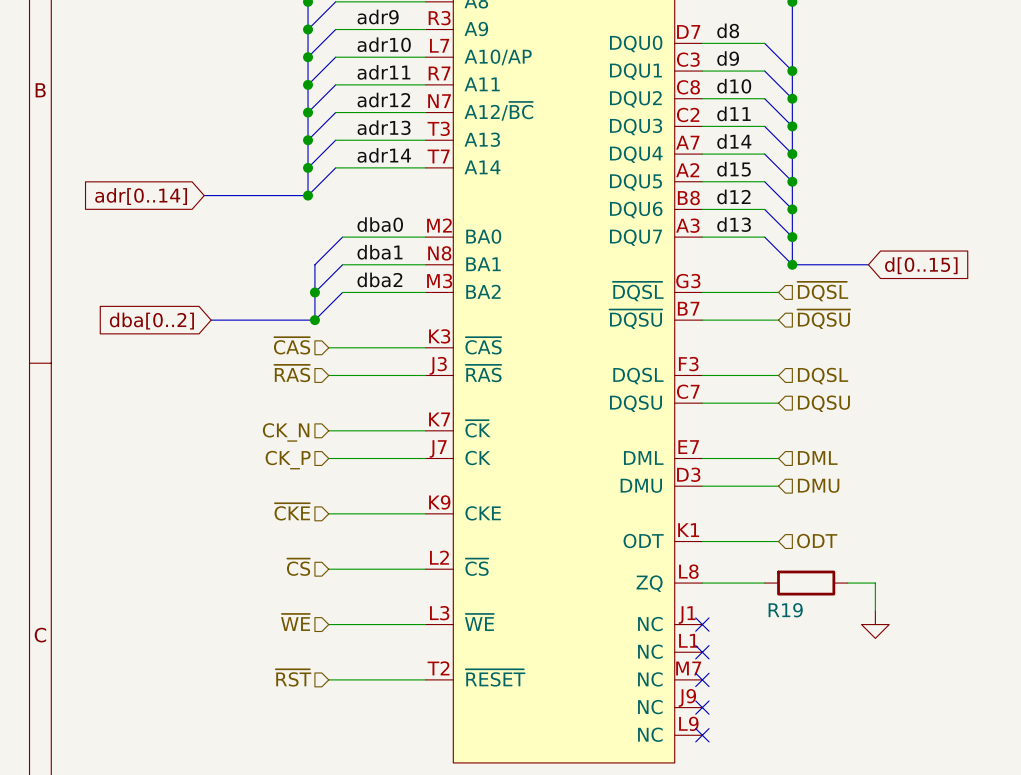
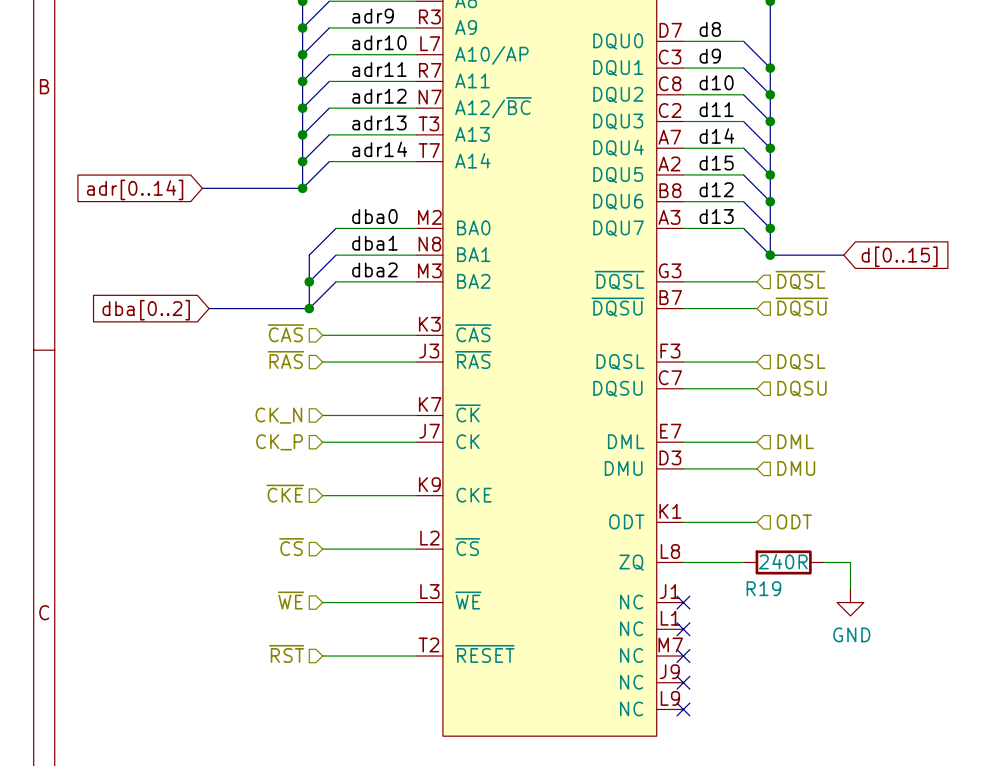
R19 value: none -> 240R (783, 561)
power symbol text: none -> GND (851, 634)

